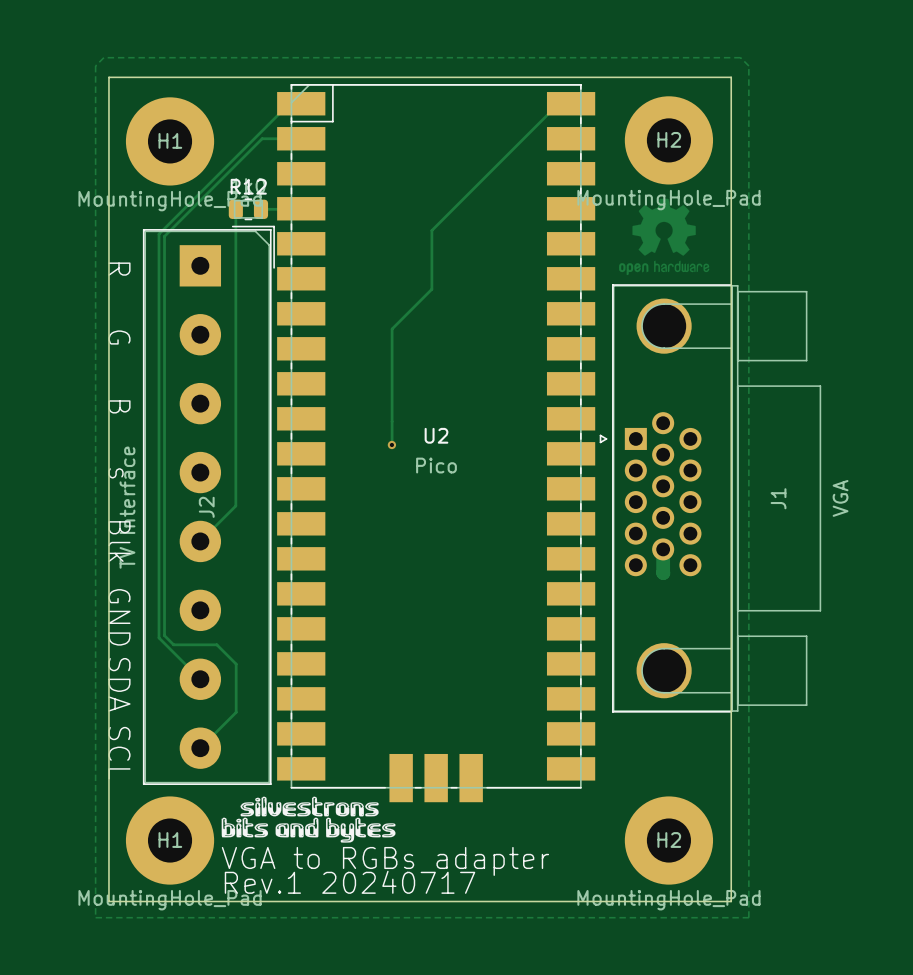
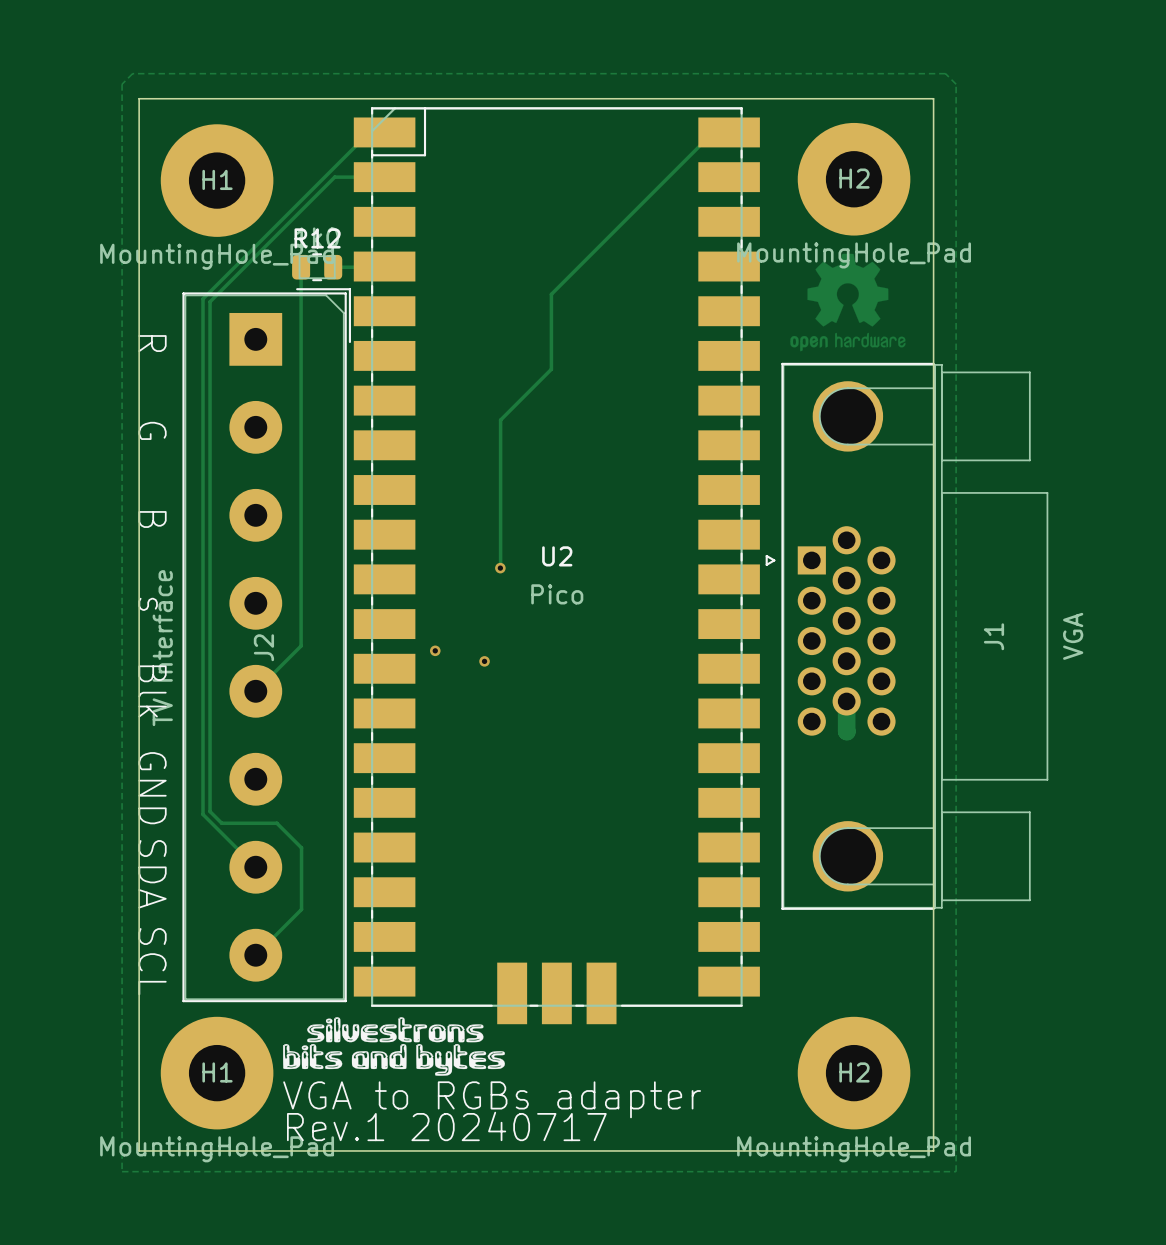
via: none -> (435, 650)
via: none -> (484, 661)

